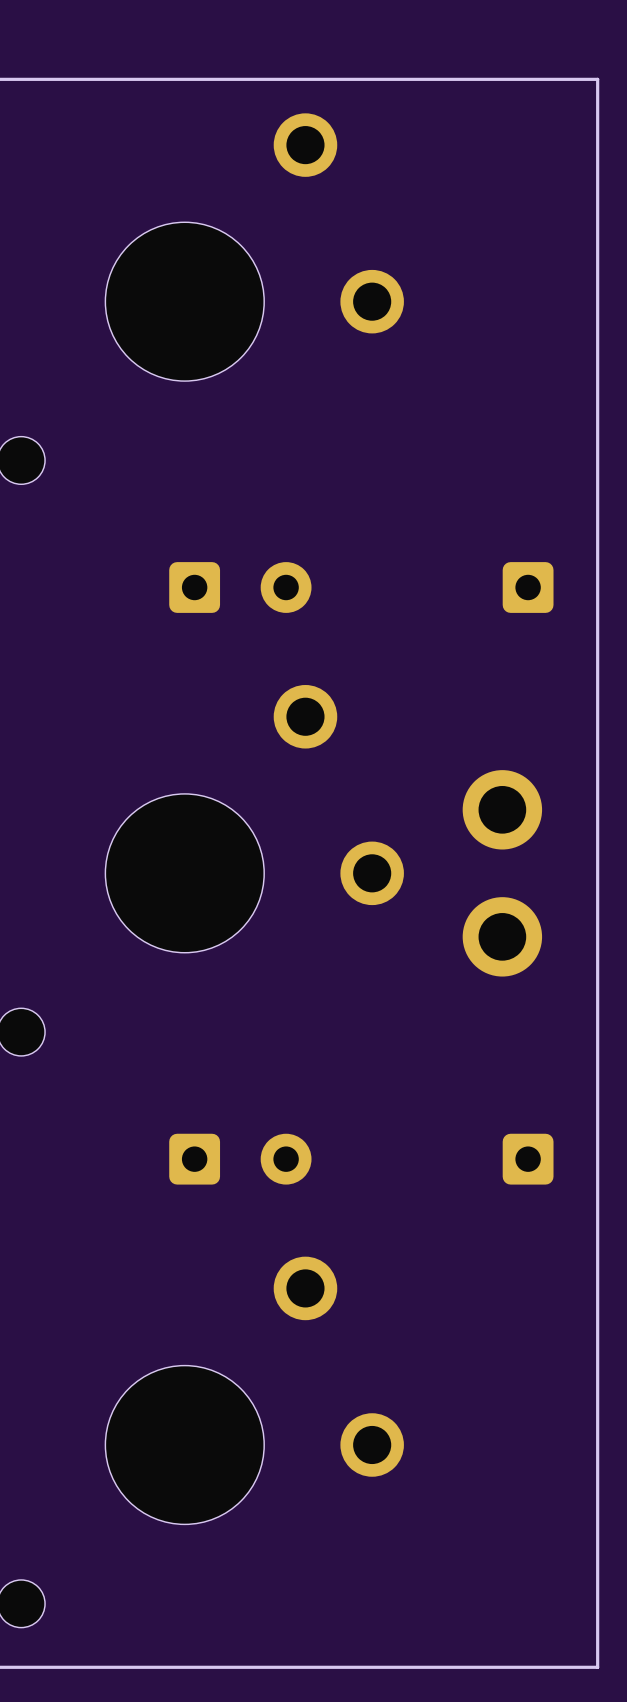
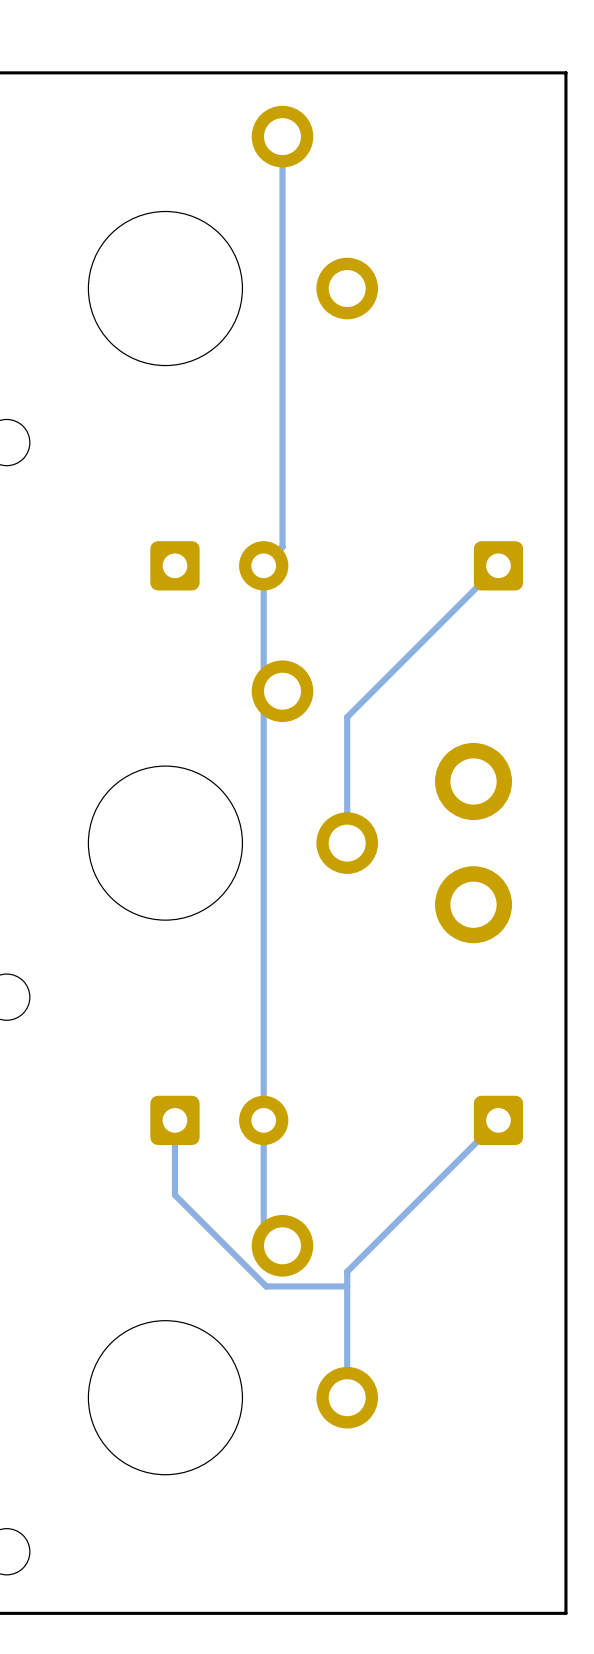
track: none -> (282, 136) (282, 547) (263, 565) (263, 672) (282, 691) (263, 710) (263, 1227) (282, 1245)
track: none -> (498, 565) (347, 717) (347, 843)
track: none -> (174, 1120) (174, 1195) (266, 1286) (347, 1286)
track: none -> (498, 1120) (347, 1271) (347, 1397)

